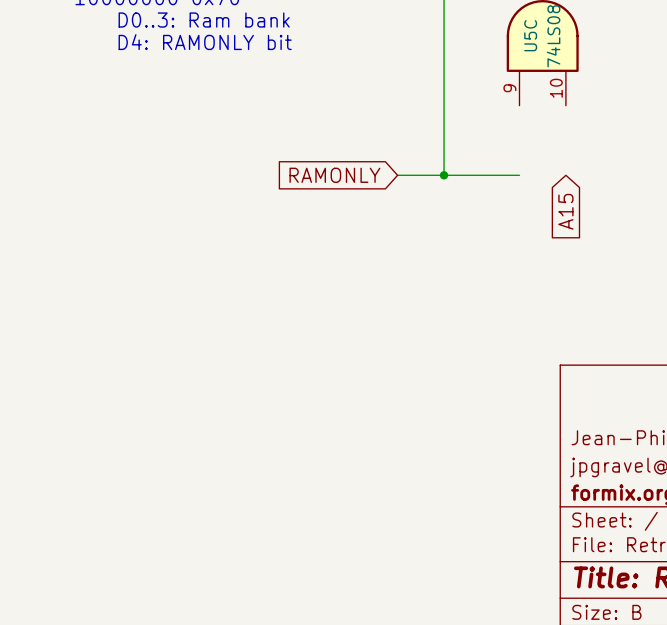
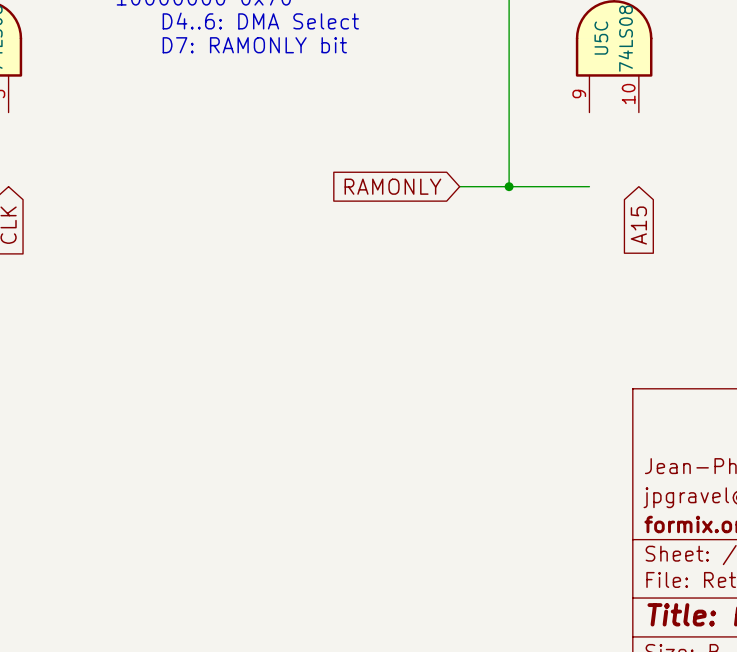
text: D0..3: Ram bank (204, 20) -> D4..6: DMA Select (260, 21)
text: D4: RAMONLY bit (205, 42) -> D7: RAMONLY bit (254, 45)

